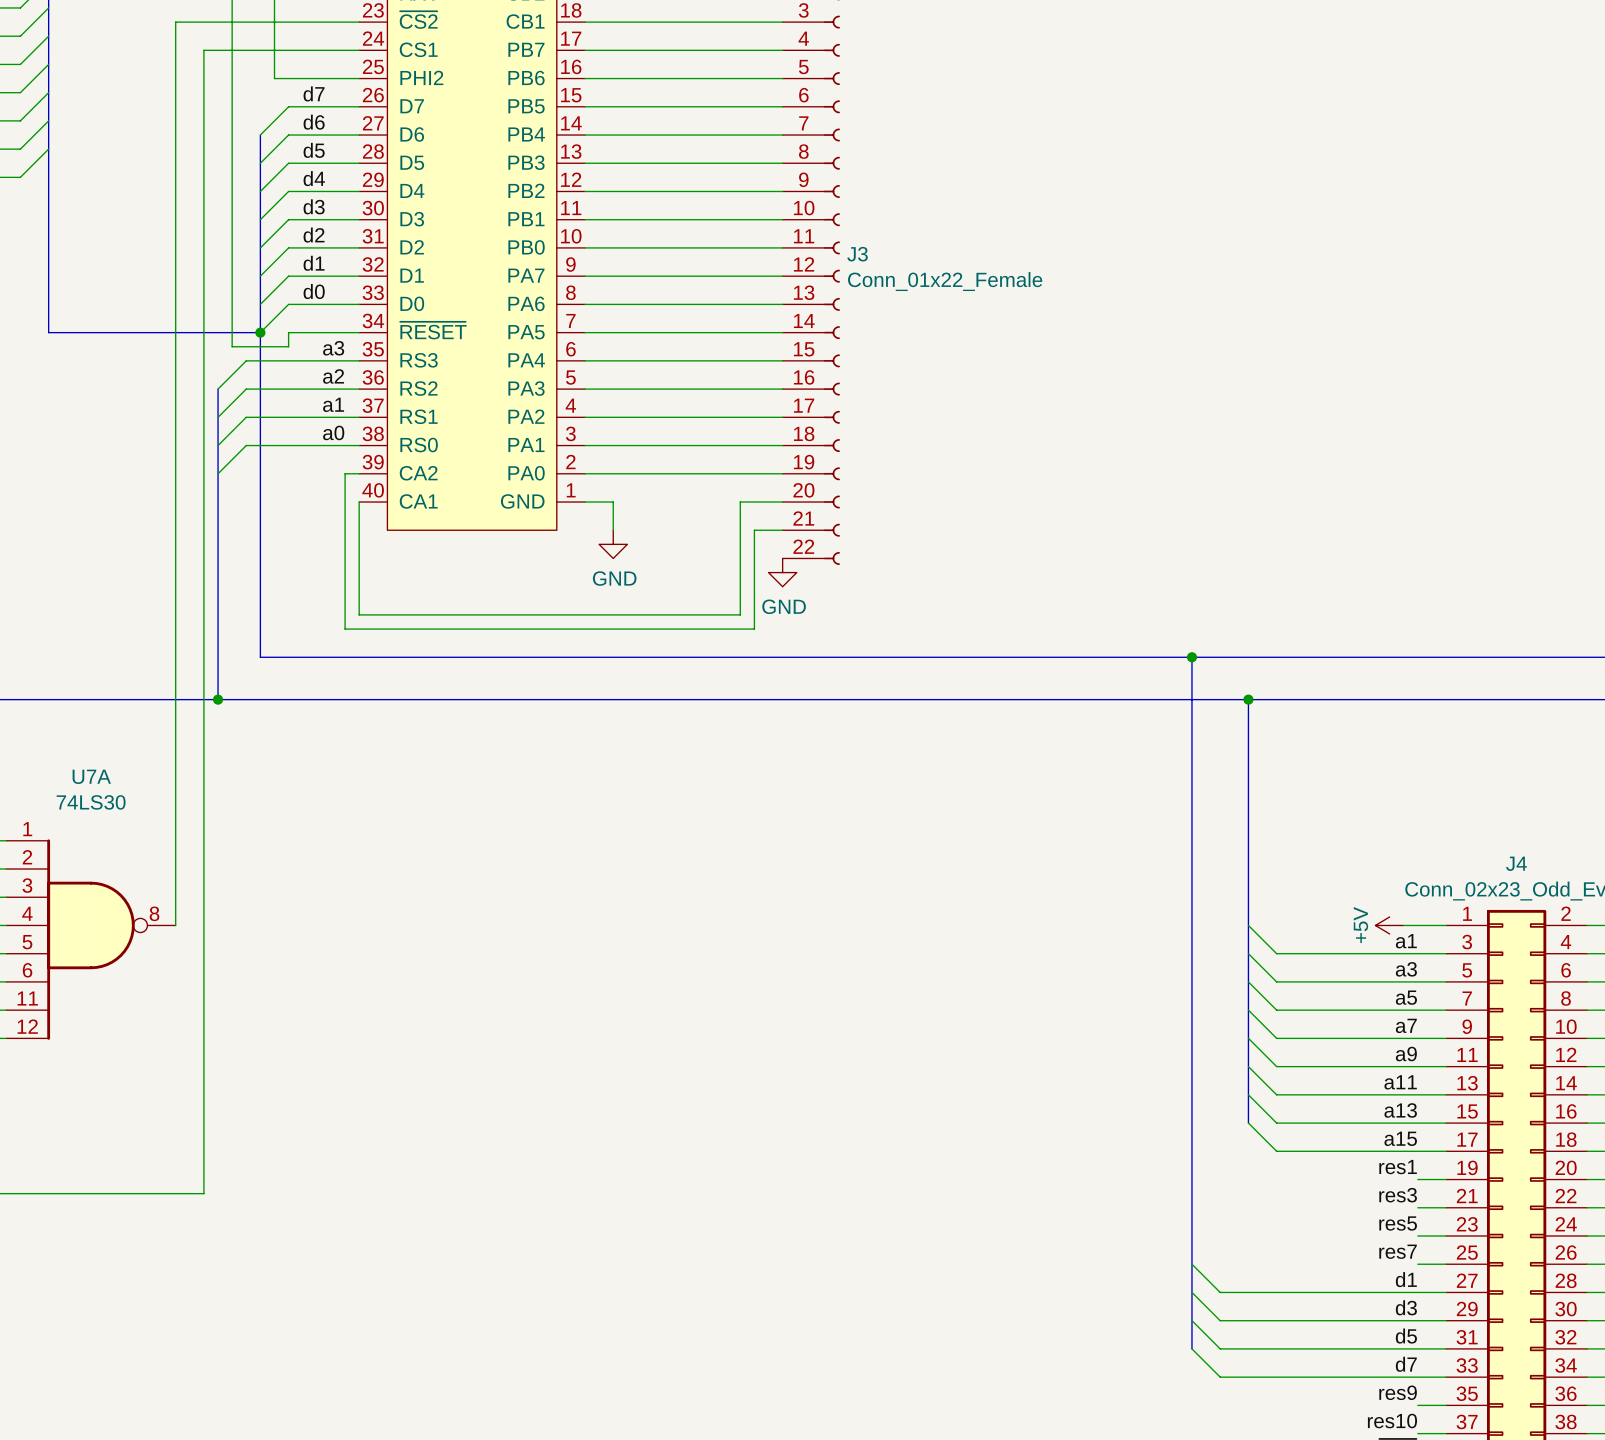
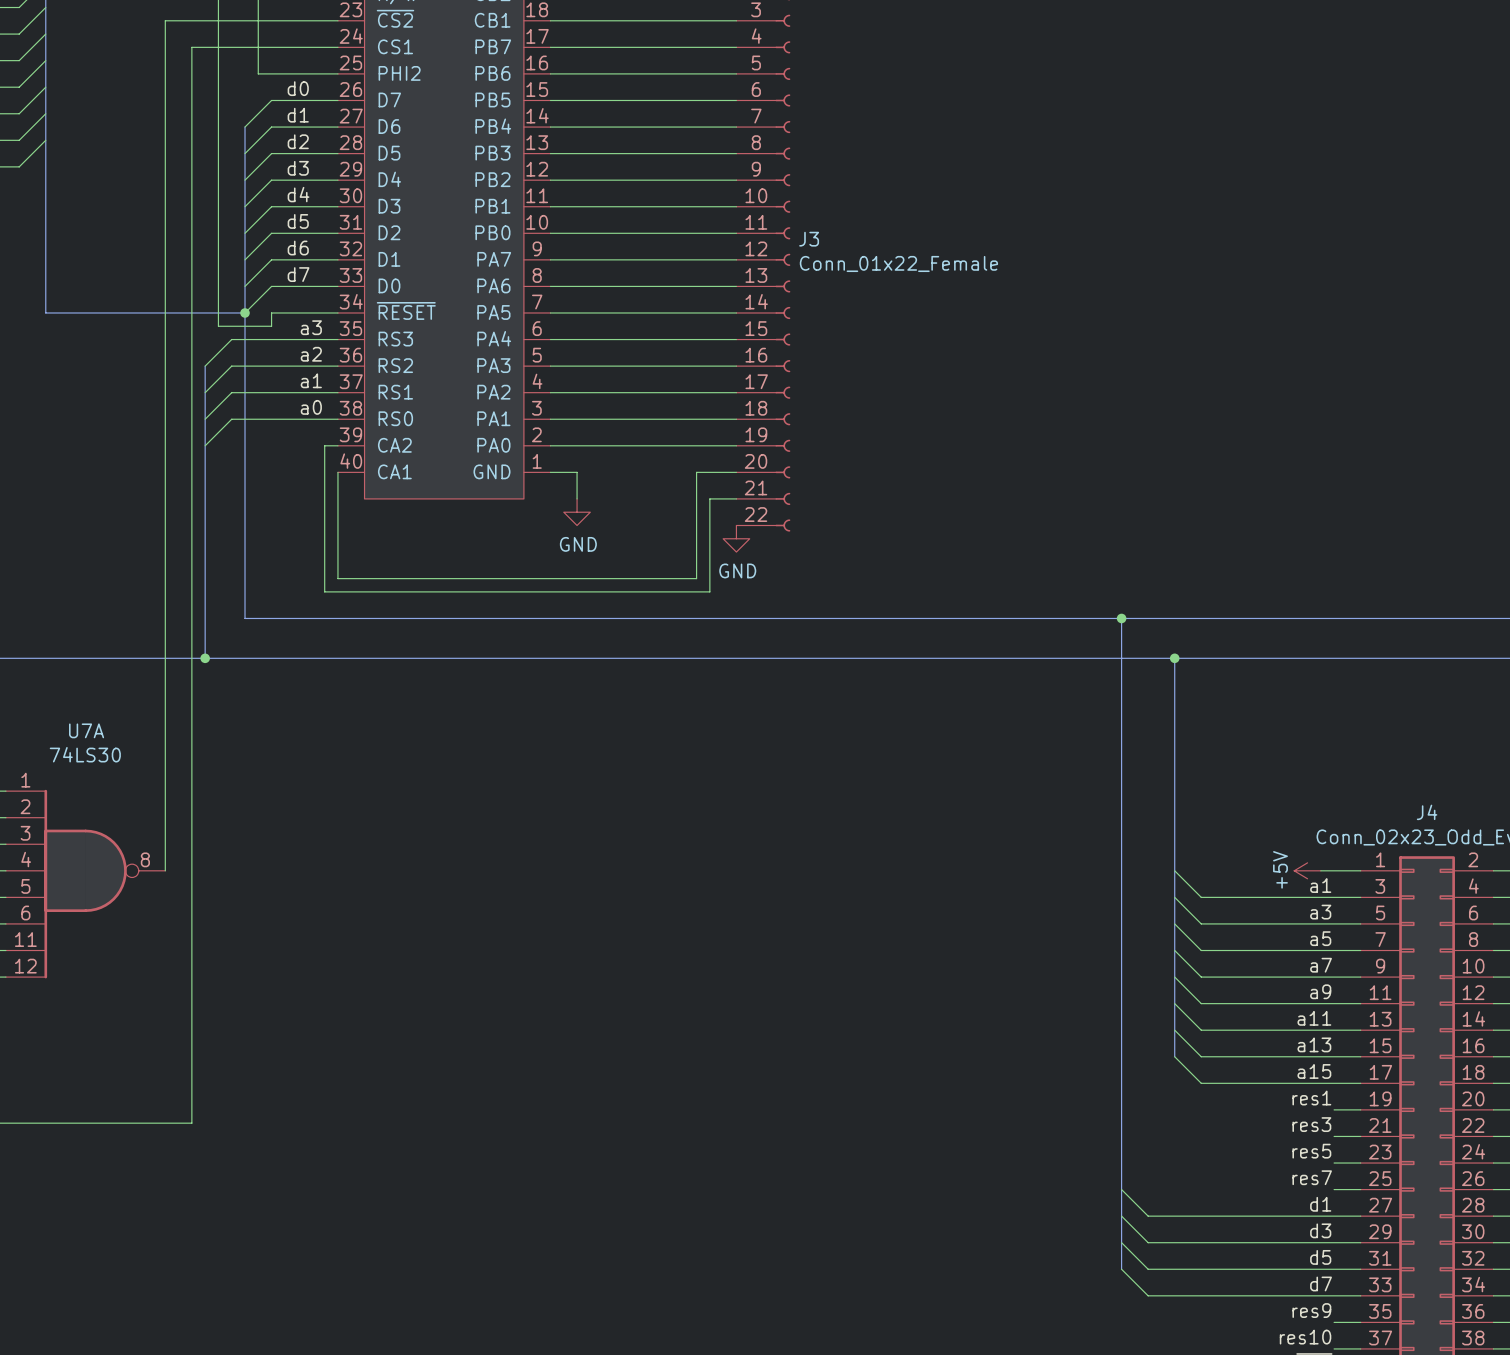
label: d7 (314, 93) -> d0 (298, 88)
label: d6 (314, 122) -> d1 (298, 115)
label: d5 (314, 150) -> d2 (298, 141)
label: d4 (314, 178) -> d3 (298, 168)
label: d3 (314, 206) -> d4 (298, 194)
label: d2 (314, 235) -> d5 (298, 221)
label: d1 (314, 263) -> d6 (298, 248)
label: d0 (314, 291) -> d7 (298, 274)

